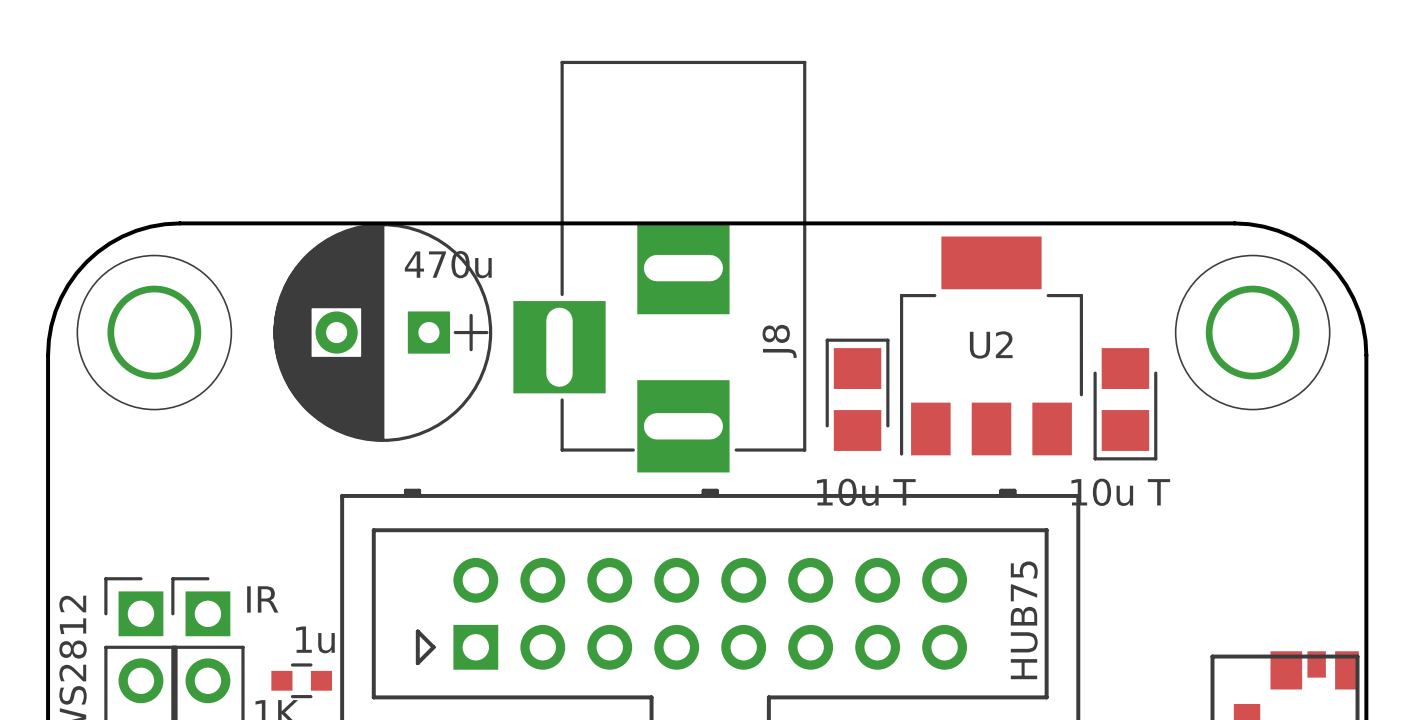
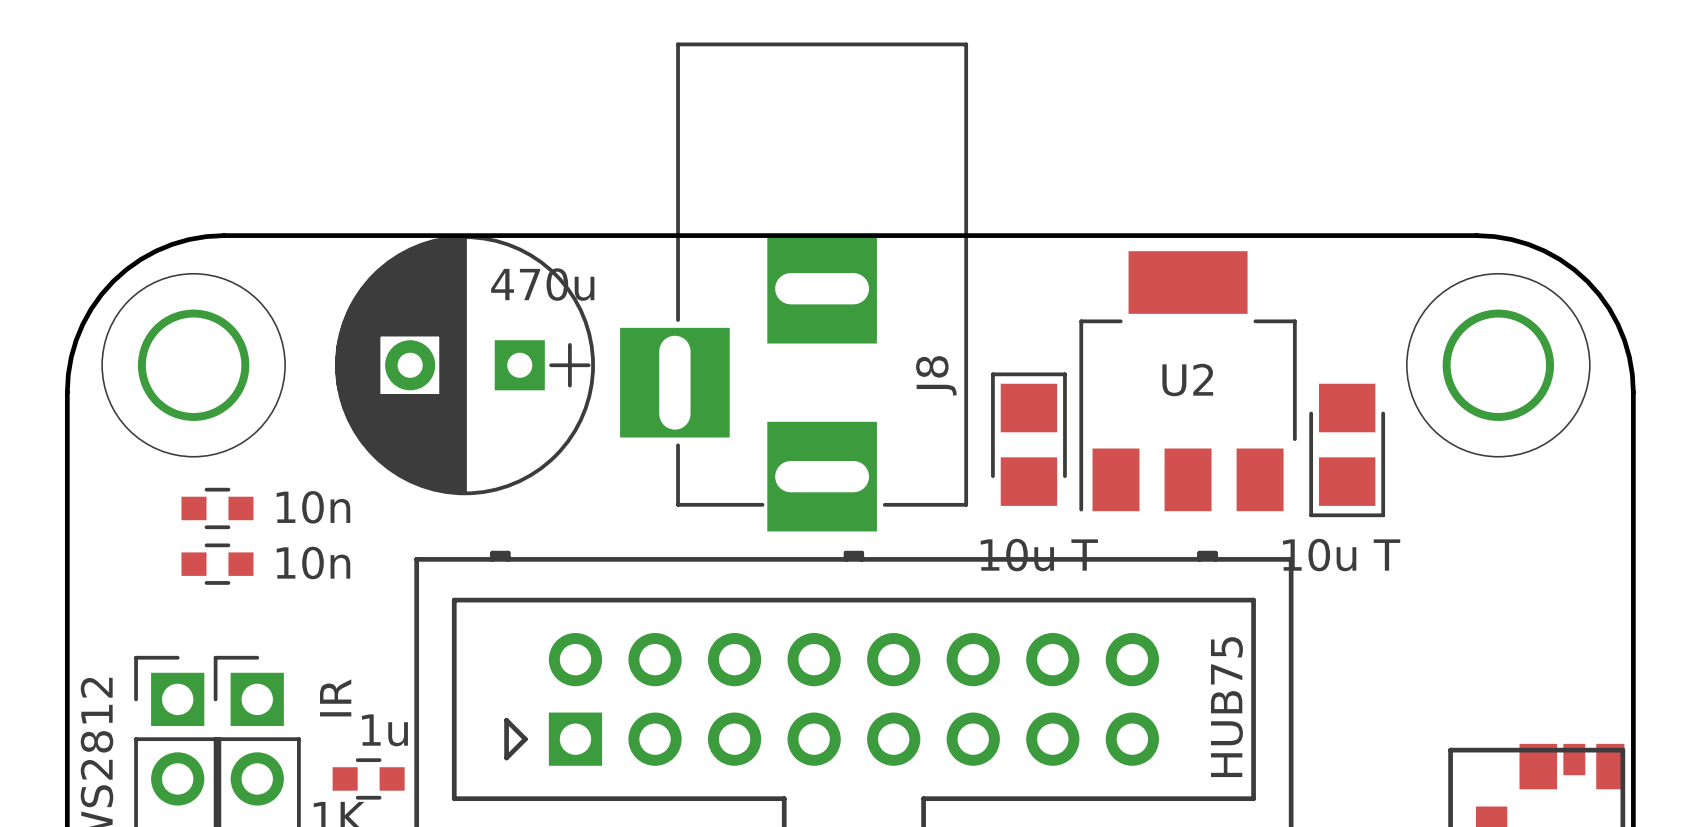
part: none -> 10n (217, 508)
part: none -> 10n (217, 564)
part value rotation: 0° (262, 599) -> 90° counterclockwise (335, 697)

